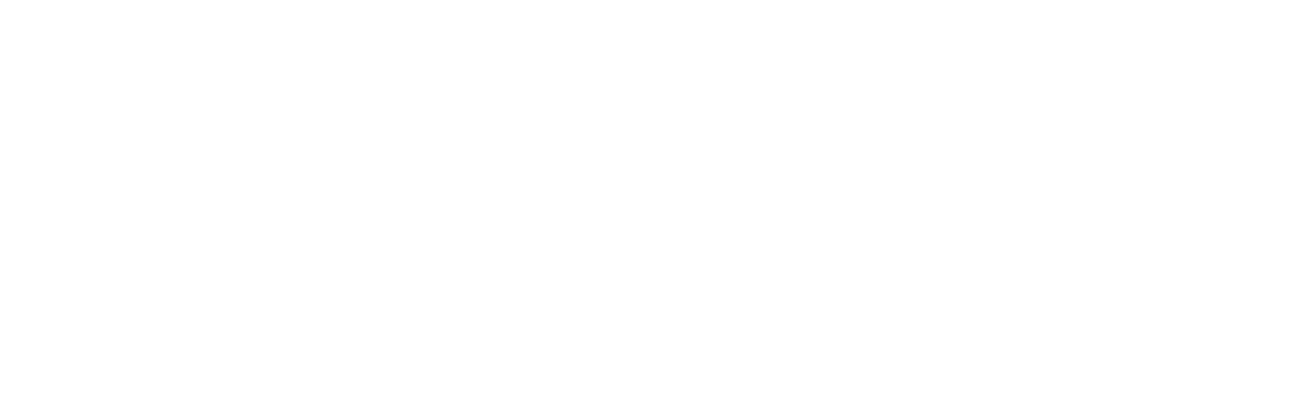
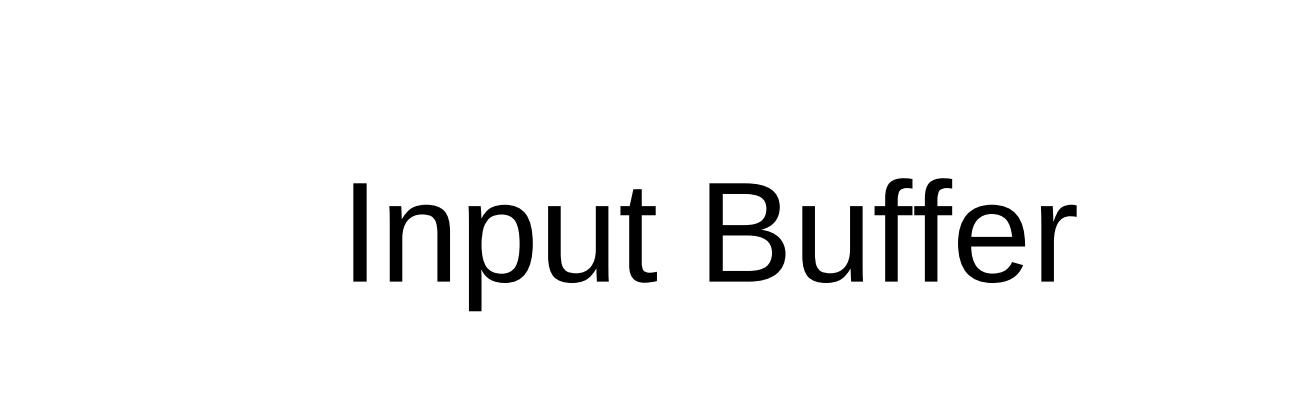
text: none -> Input Buffer (714, 244)

